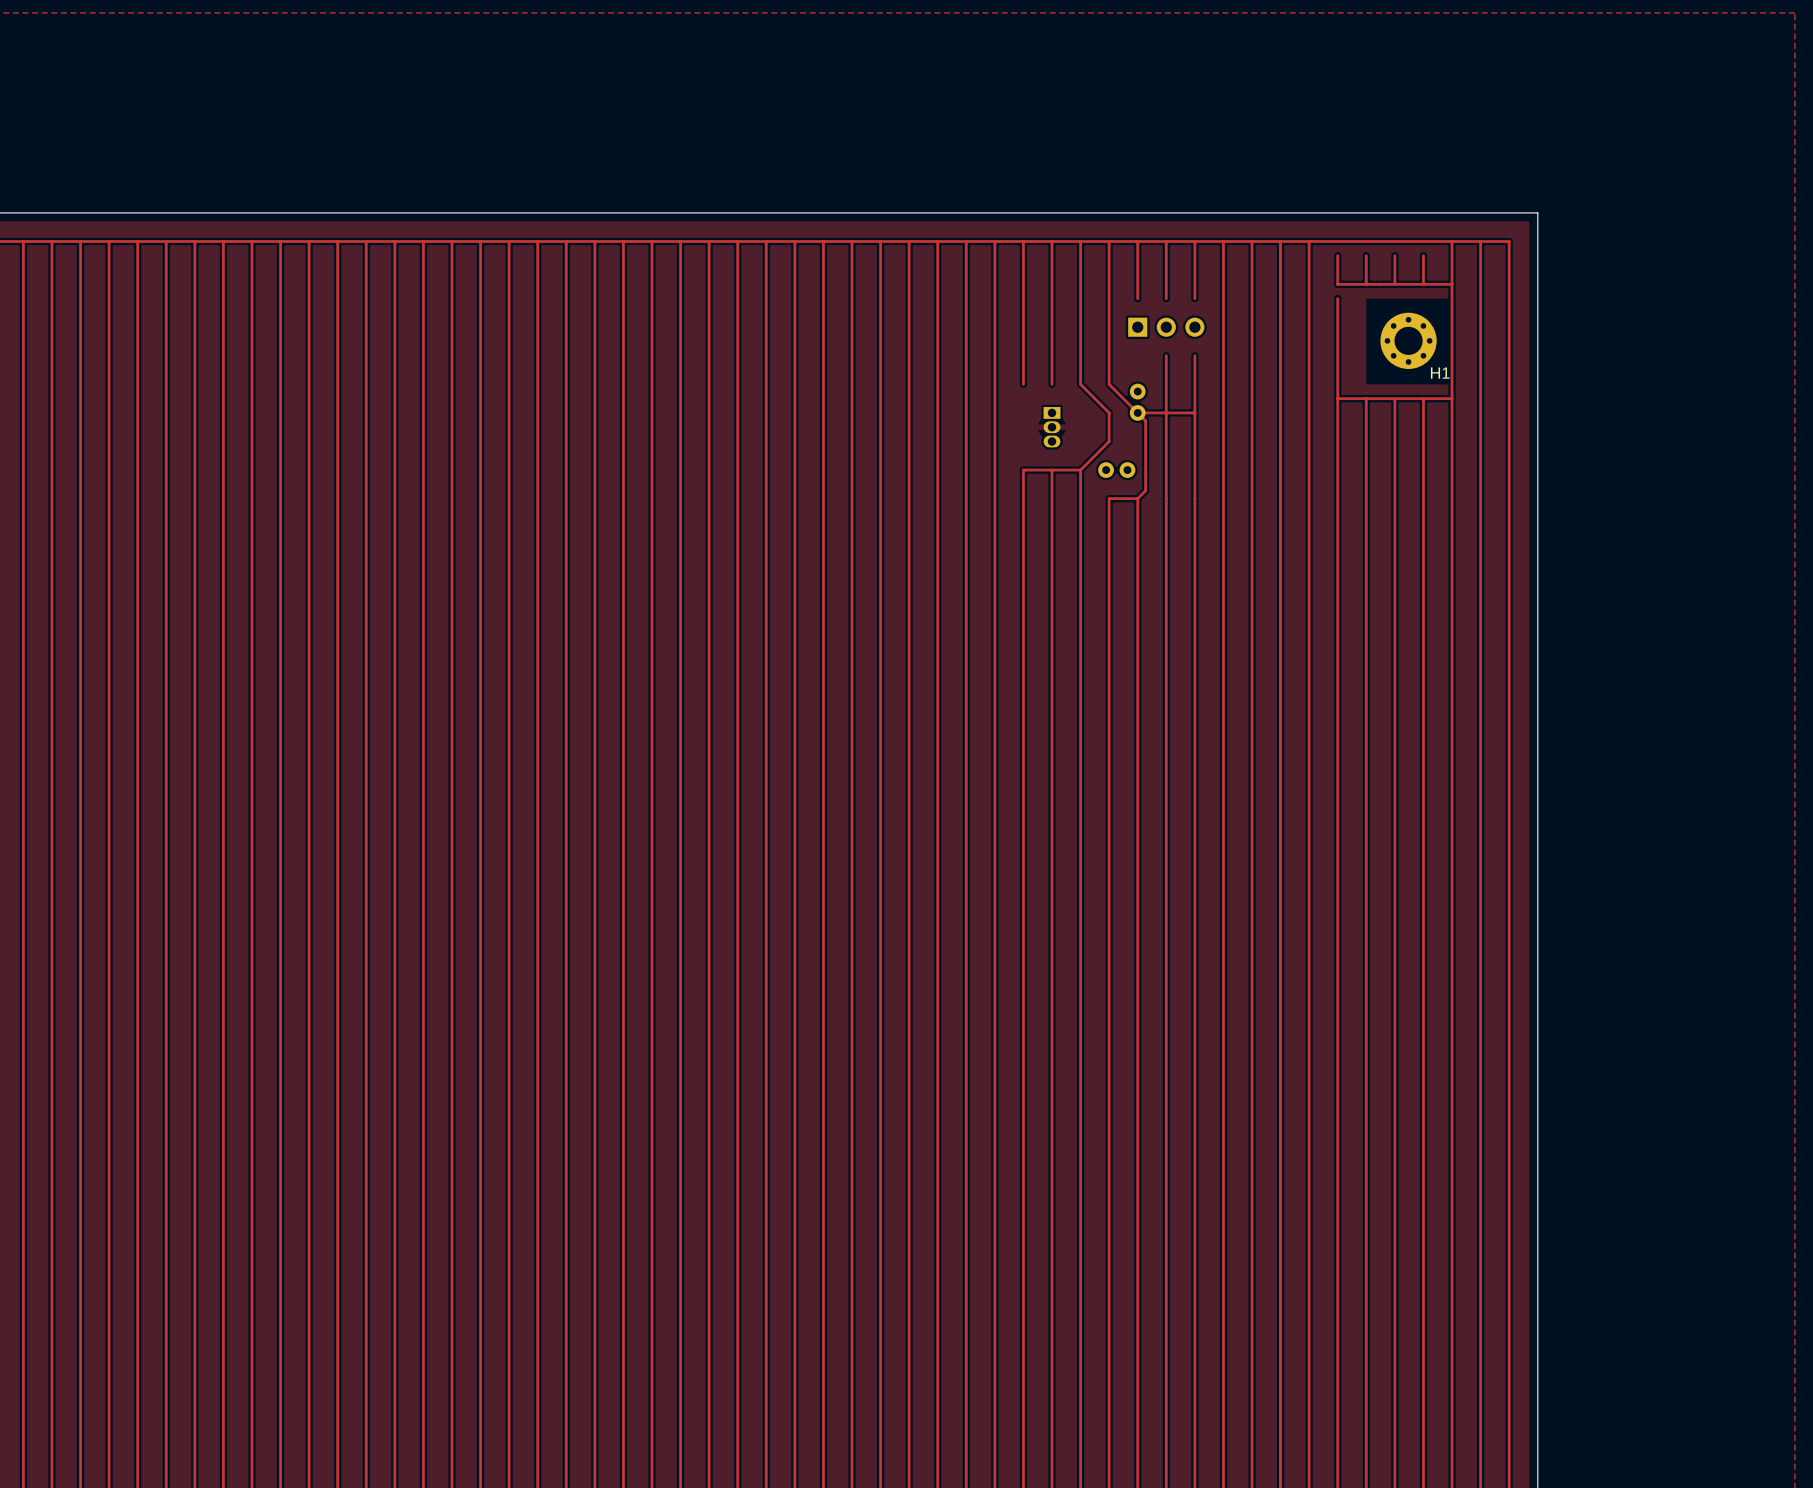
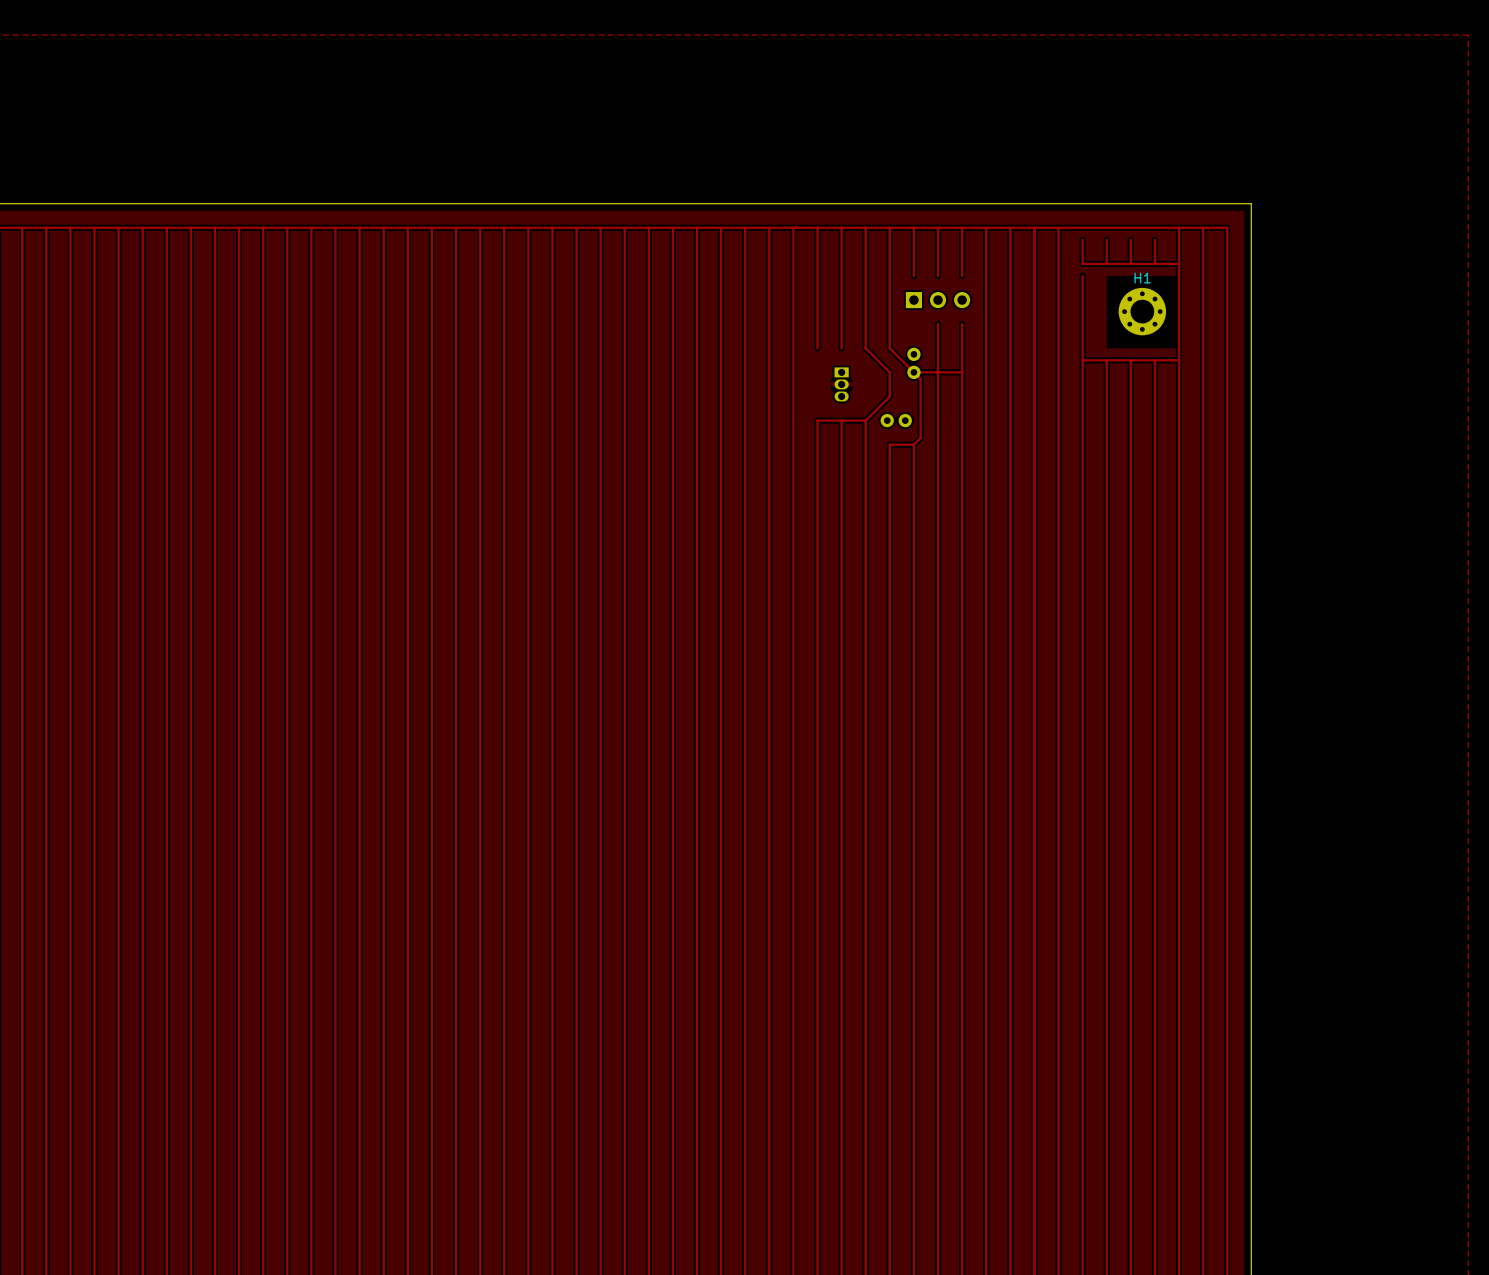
H1 name position: H1 (1440, 373) -> H1 (1142, 278)

